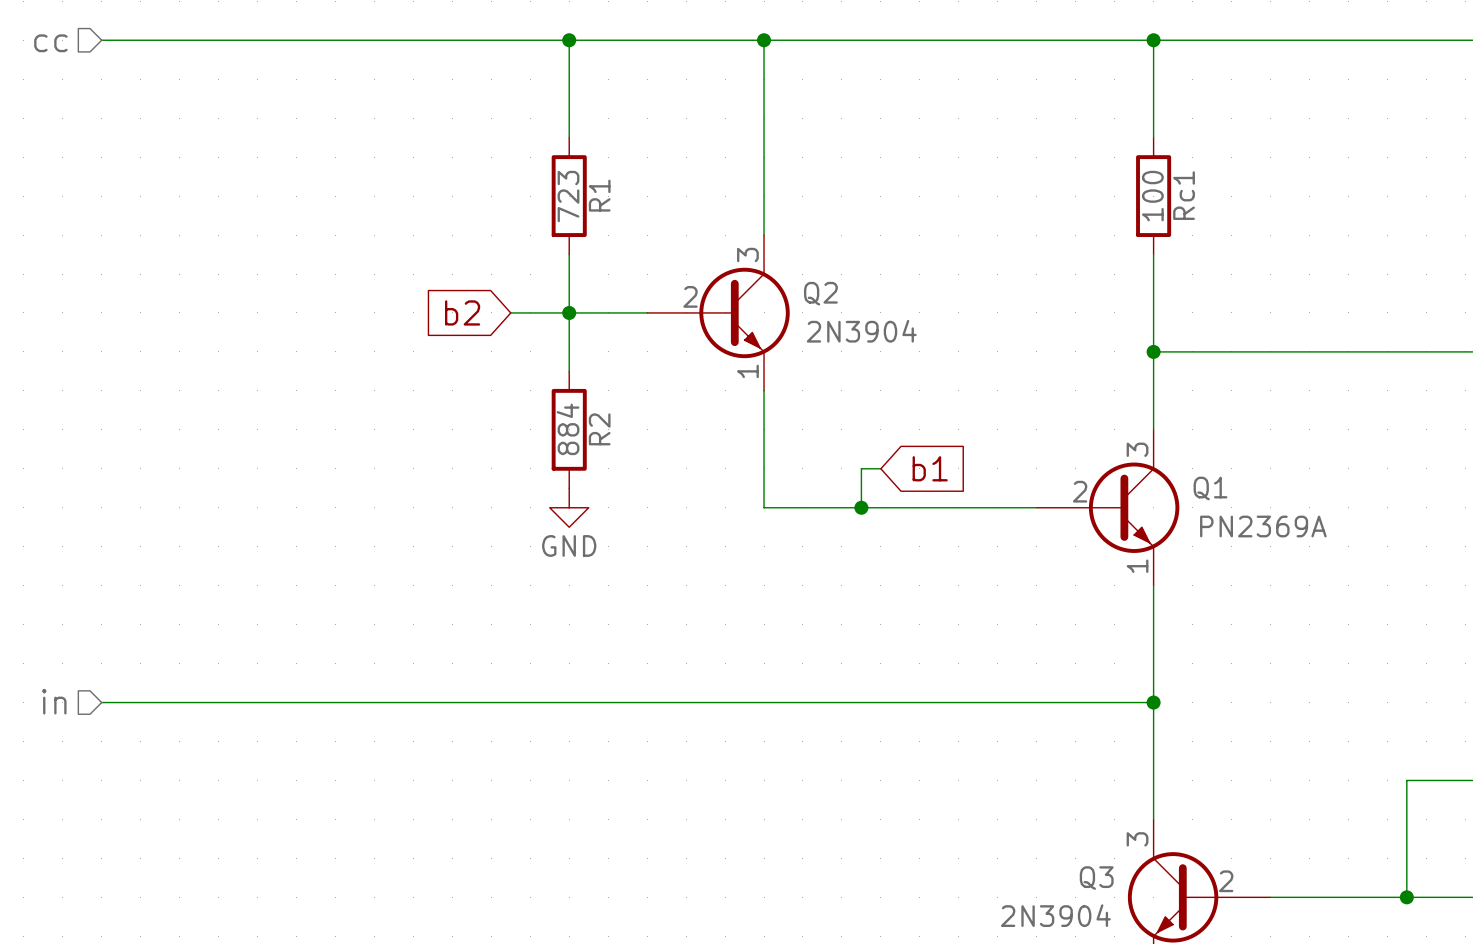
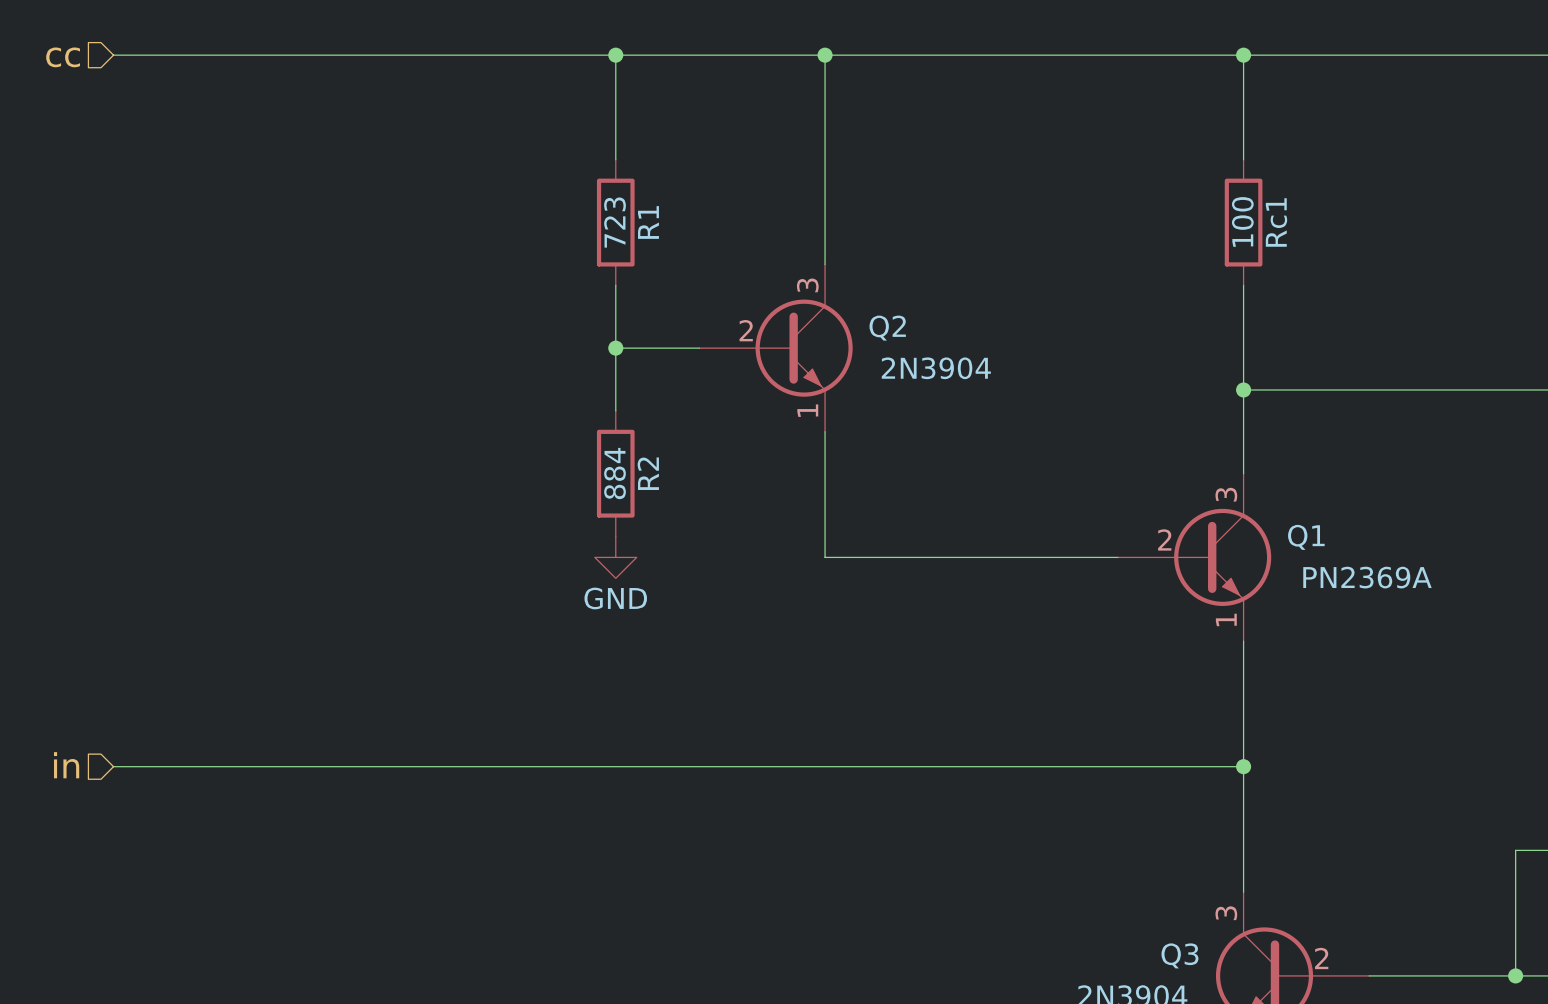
global label: b2 (462, 312) -> none
wire: (510, 312) (569, 312) -> none
wire: (880, 468) (861, 468) (861, 507) -> none
global label: b1 (930, 468) -> none
junction: (861, 507) -> none

